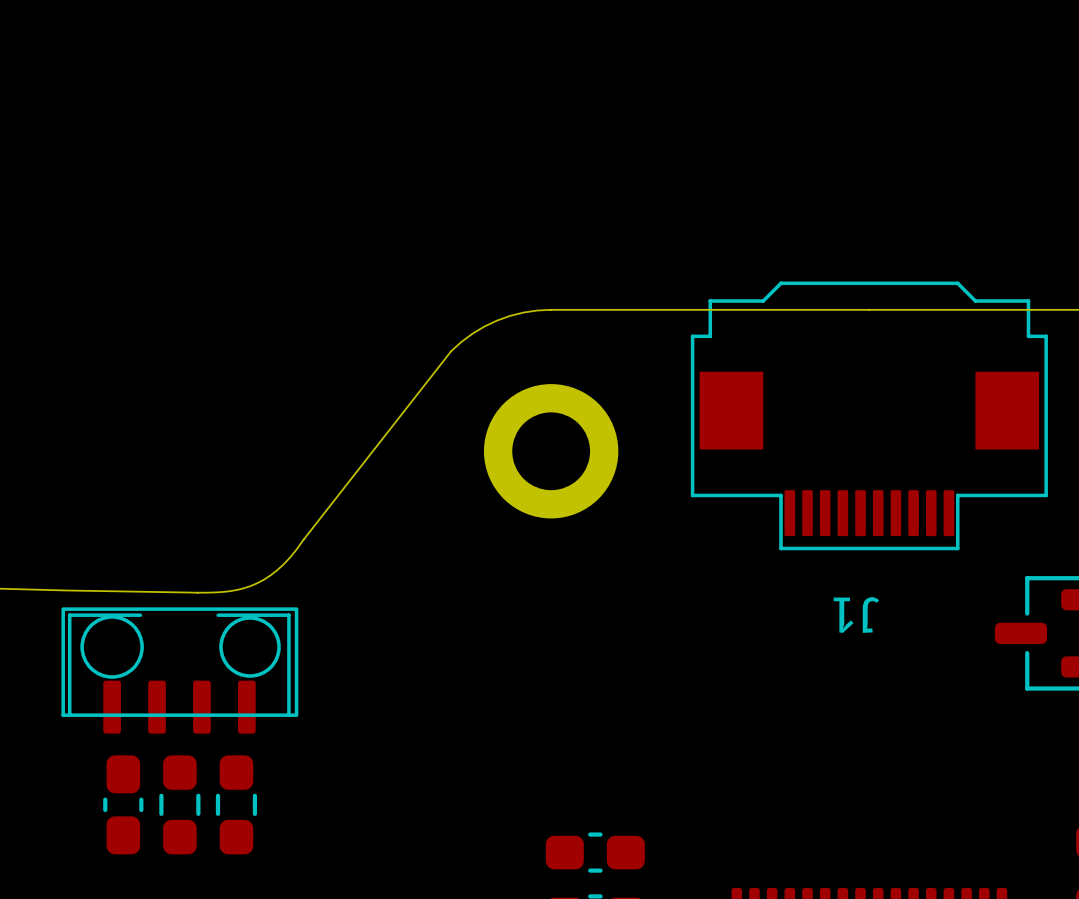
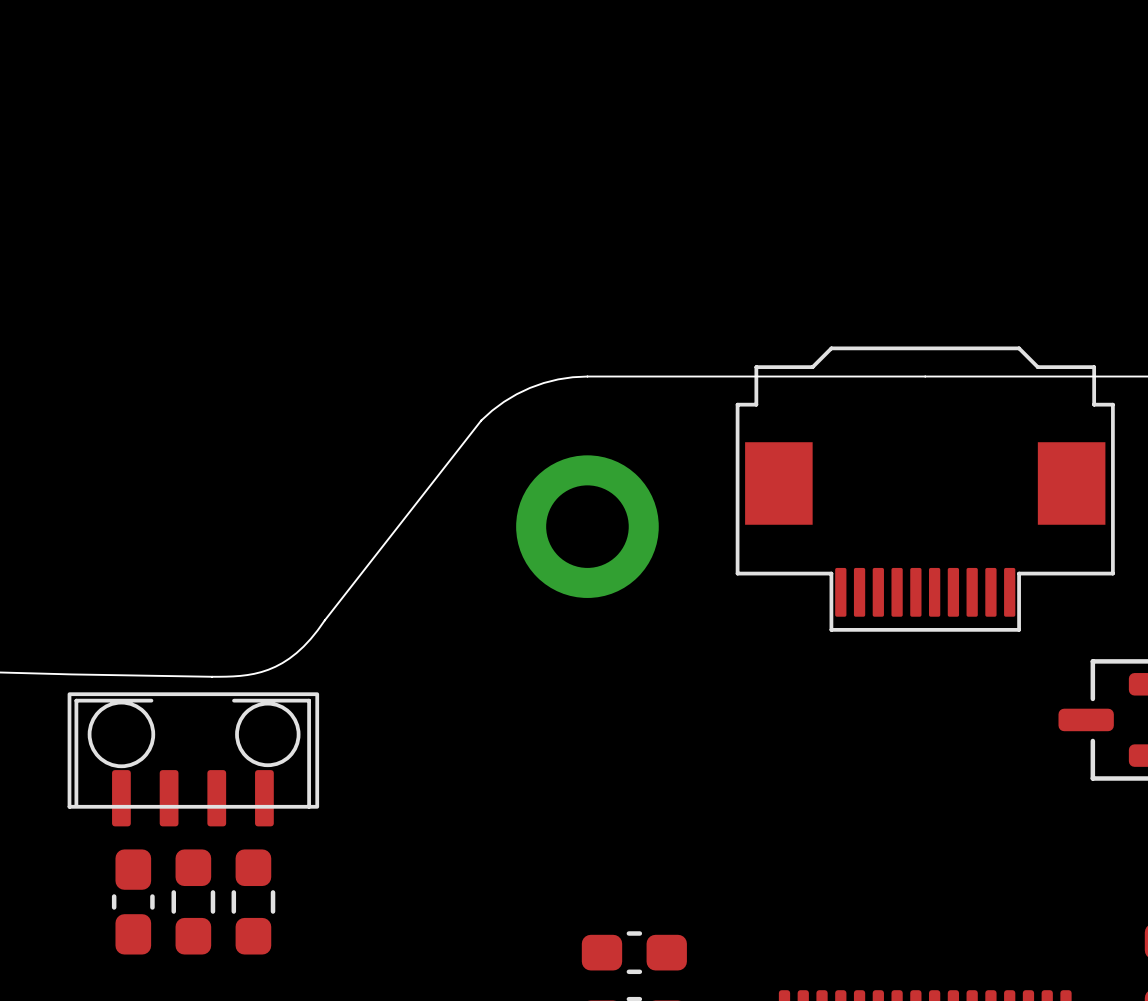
J1 name: J1 (856, 615) -> none

